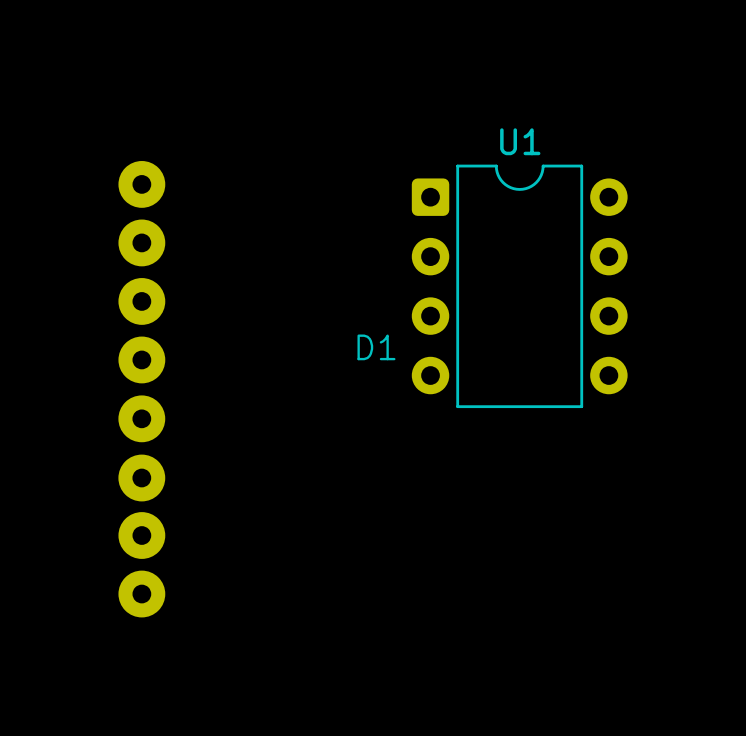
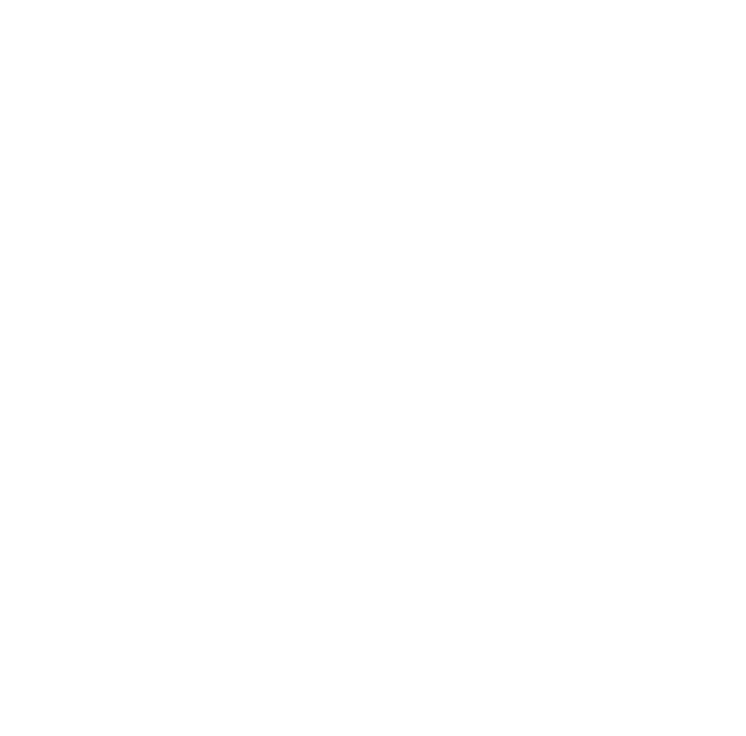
U1: (519, 286) -> none
D1: (141, 389) -> none

